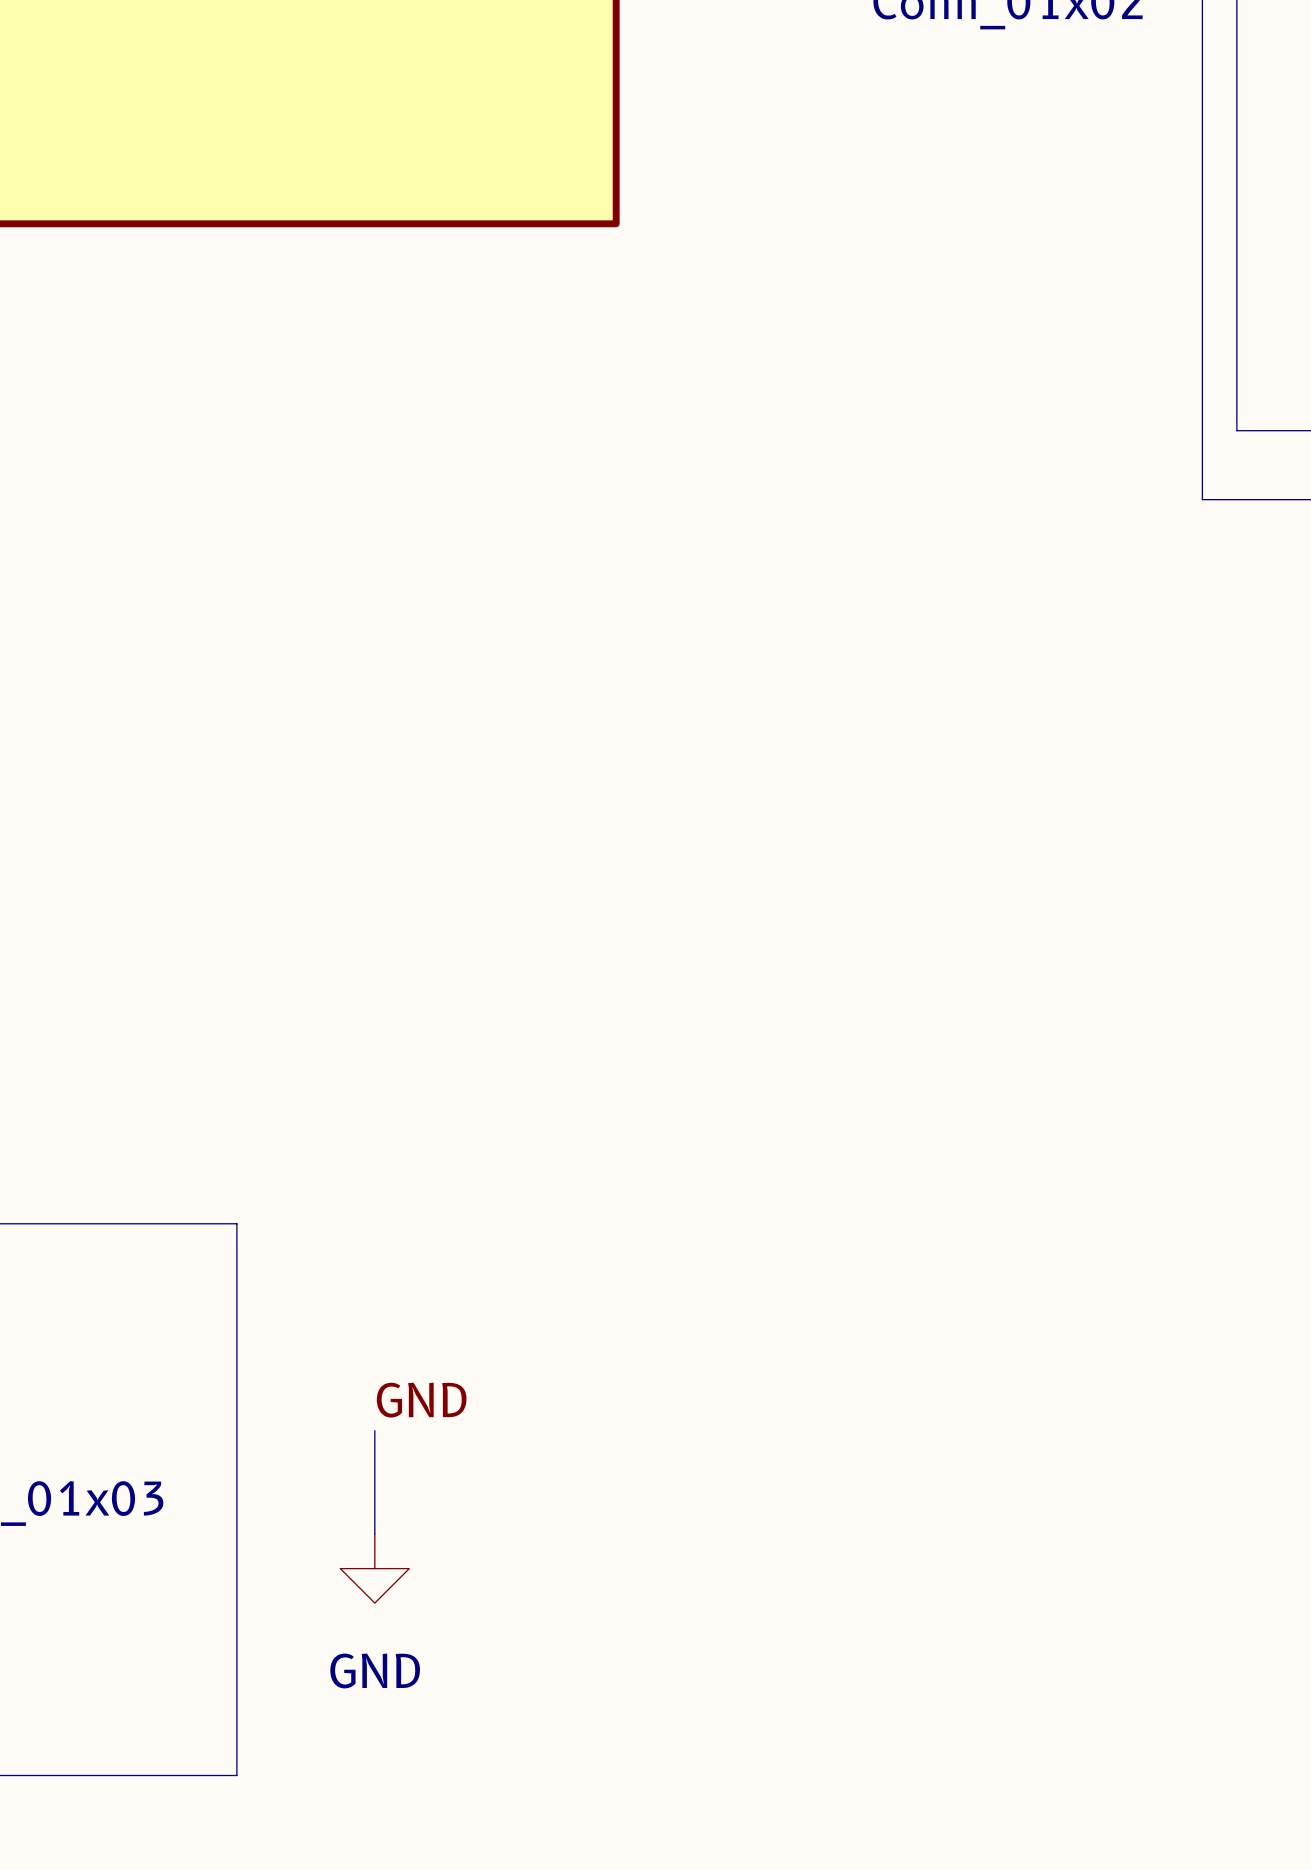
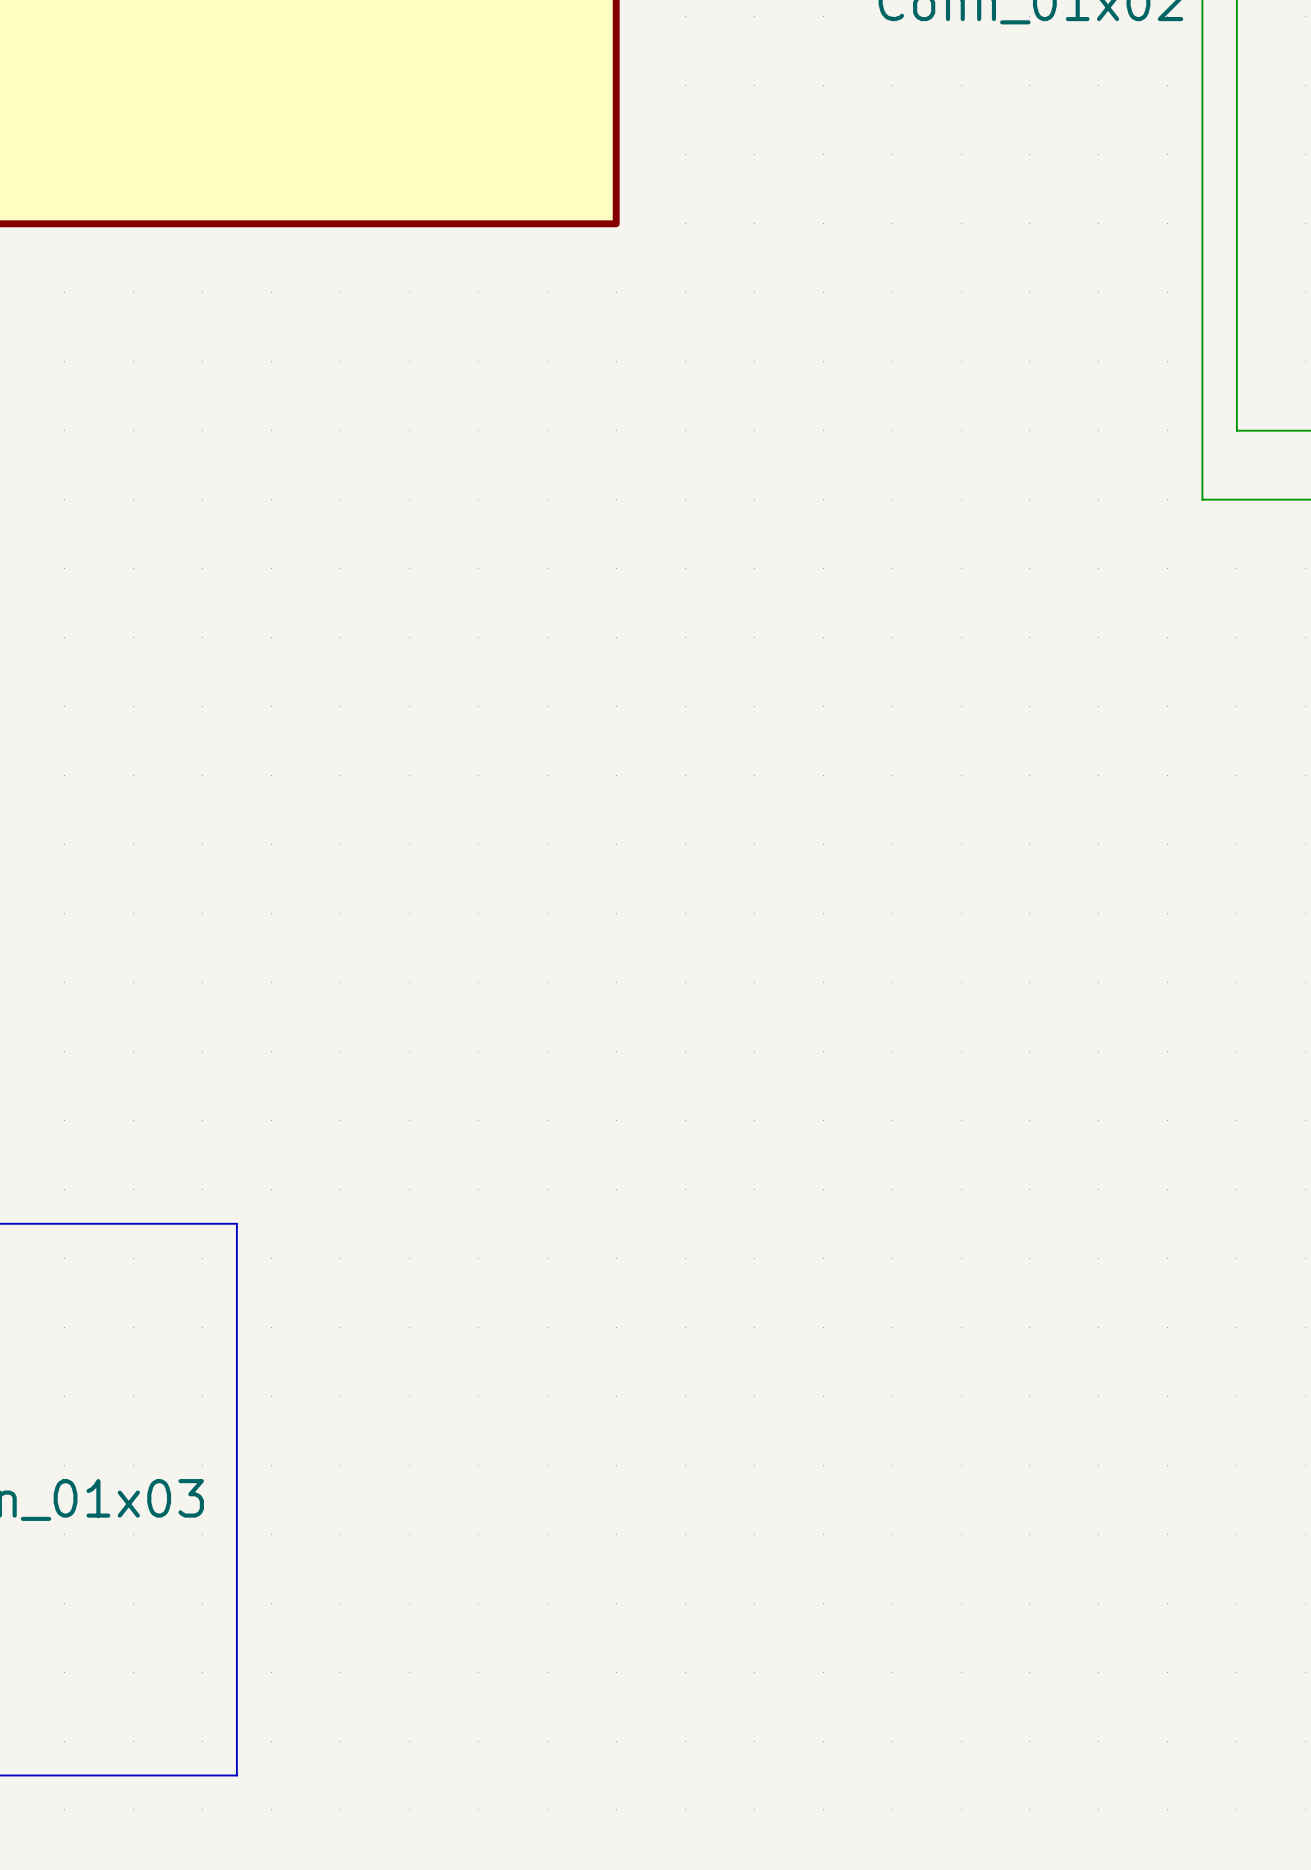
label: GND (421, 1400) -> none
wire: (374, 1430) (374, 1534) -> none
power symbol: GND (374, 1568) -> none

